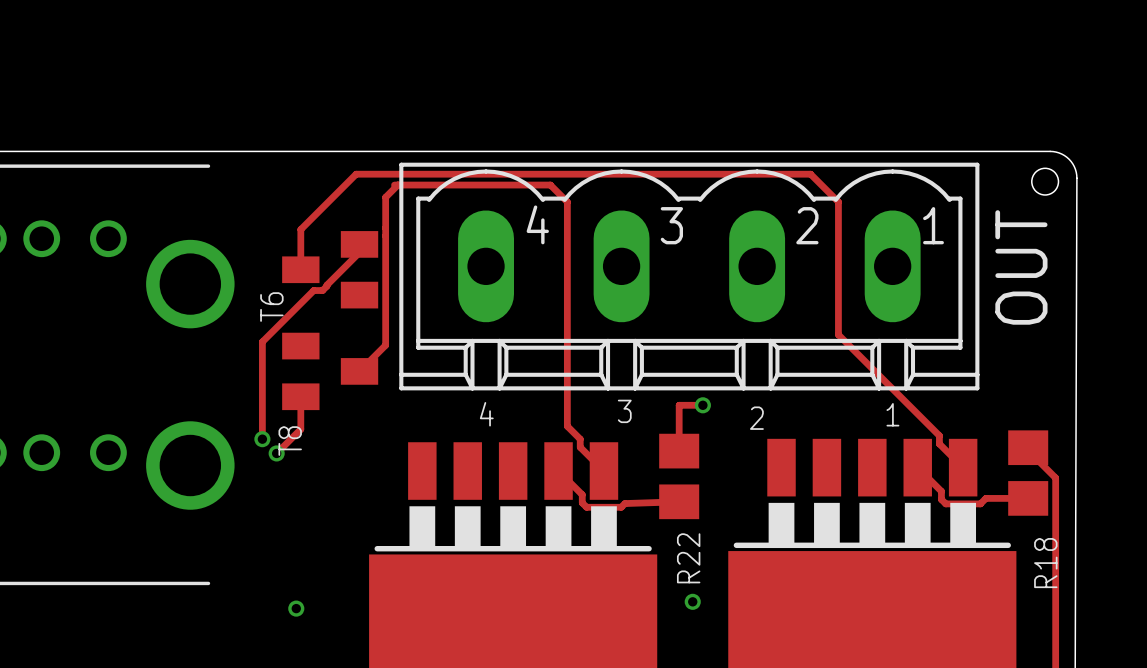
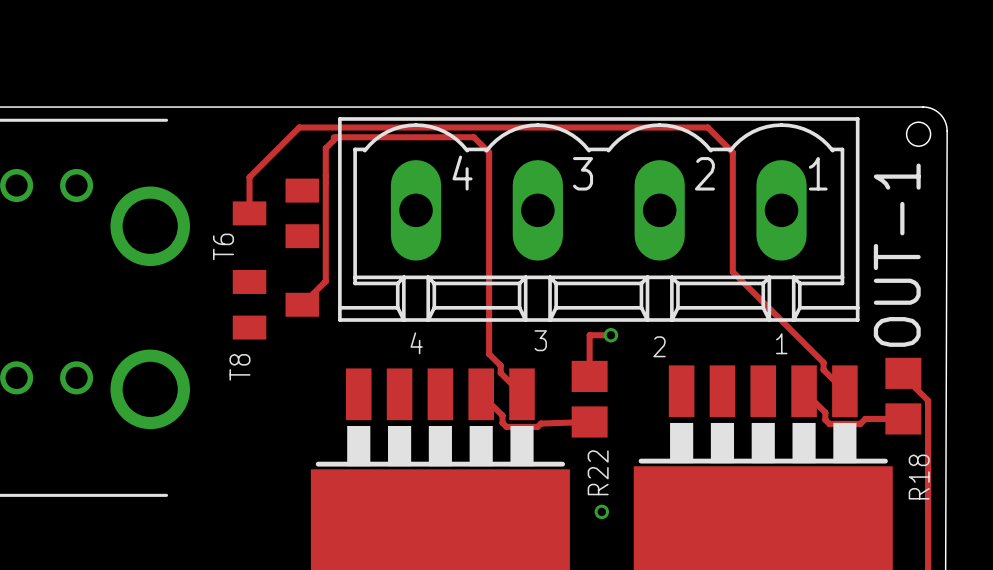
track: (359, 244) (359, 252) (326, 286) (322, 290) (313, 290) (262, 341) (262, 439) -> none
OUT name: OUT (1021, 267) -> OUT-1 (897, 255)
track: (300, 396) (300, 429) (276, 453) -> none
via: (262, 439) -> none
via: (276, 453) -> none
via: (296, 608) -> none

